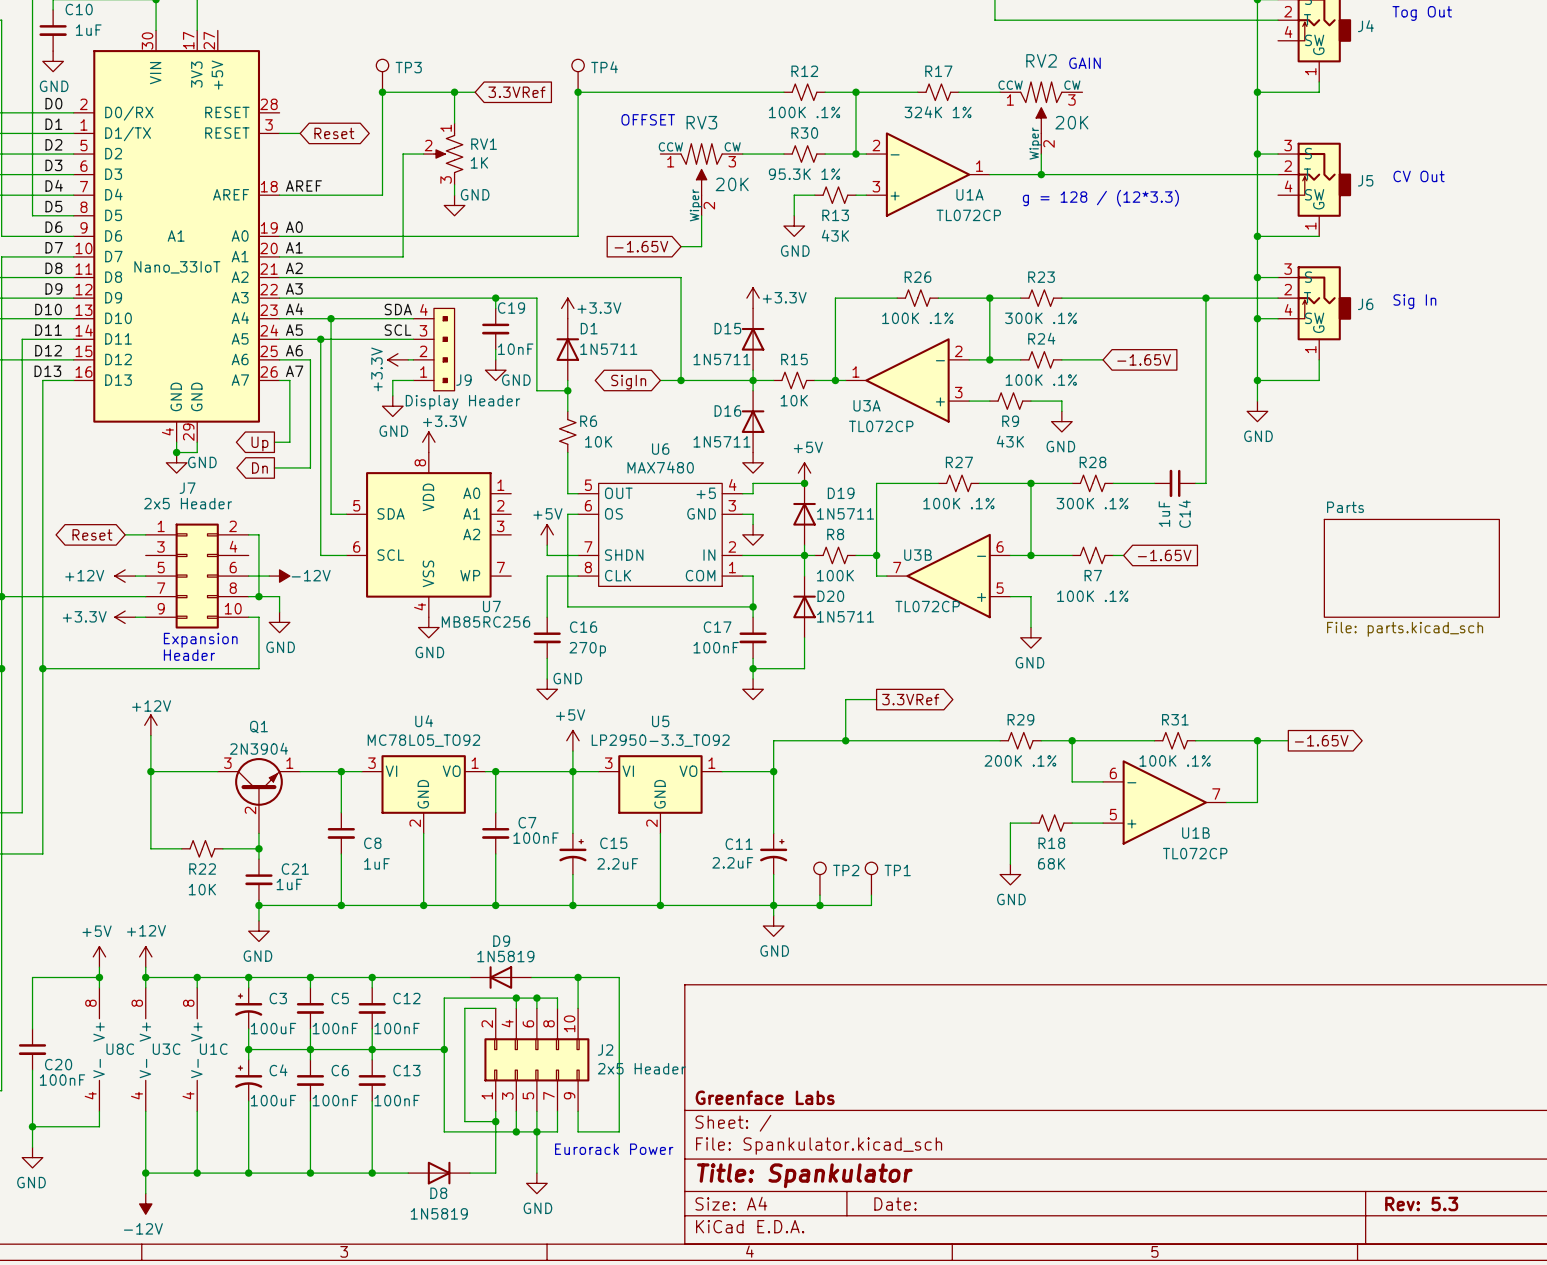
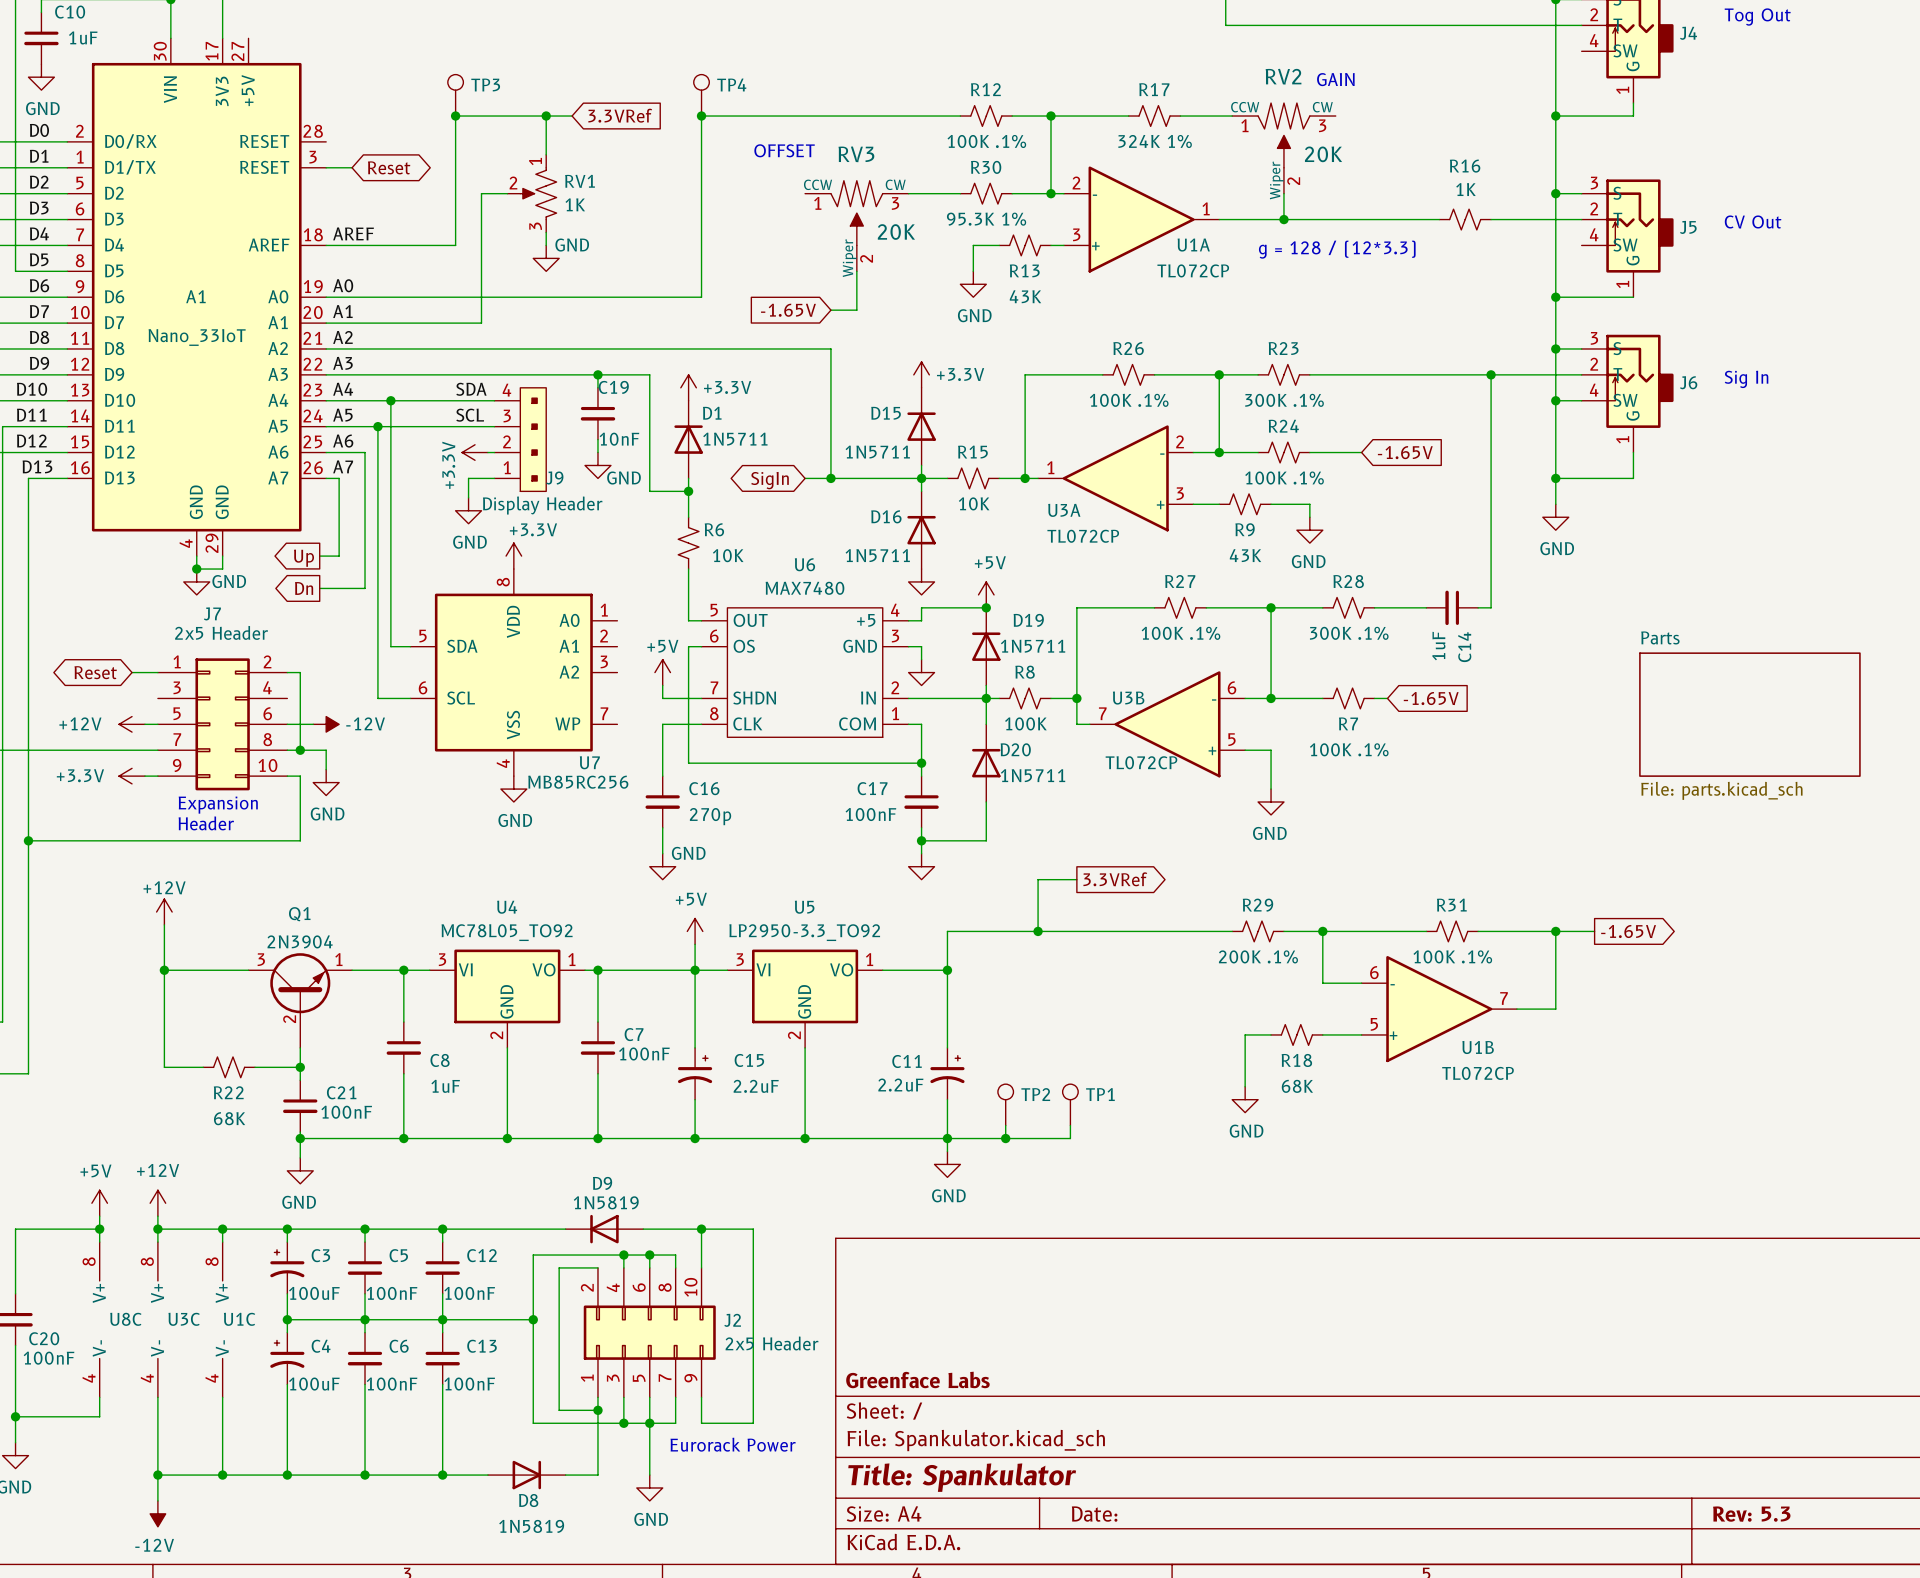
R16: none -> 1K (1465, 219)
C21 value: 1uF (289, 884) -> 100nF (346, 1112)
R22 value: 10K (202, 889) -> 68K (229, 1118)

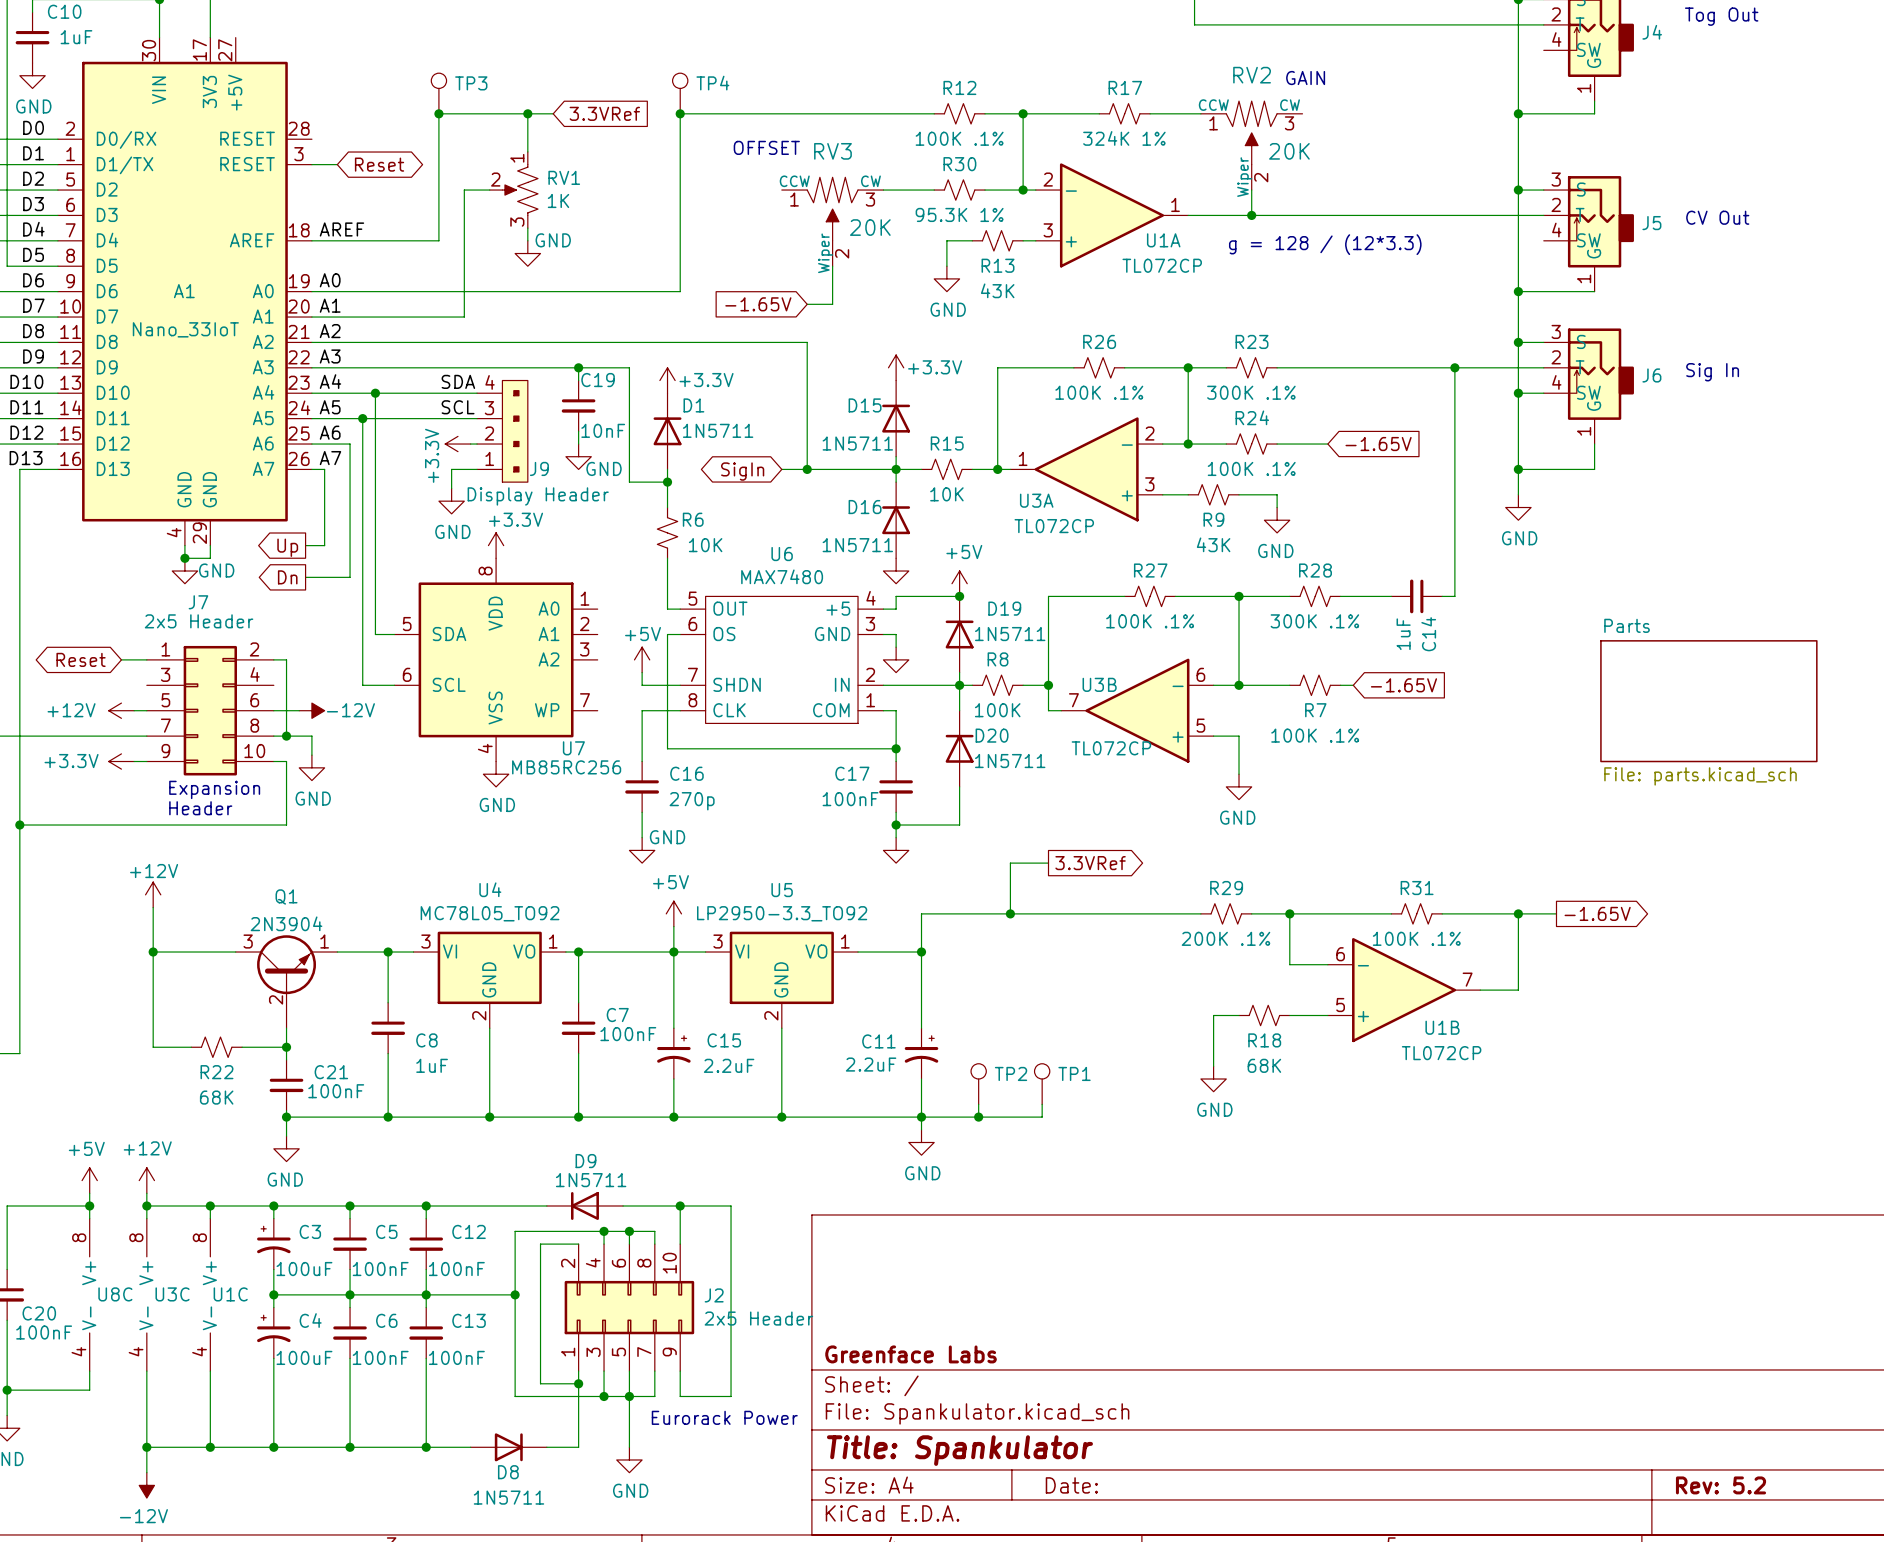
wire: none -> (1404, 215) (1454, 215)
R16: 1K (1465, 219) -> none
D9 value: 1N5819 (606, 1202) -> 1N5711 (591, 1180)
title block: Rev: 5.3 (1751, 1514) -> Rev: 5.2 (1721, 1485)
D8 value: 1N5819 (531, 1526) -> 1N5711 (508, 1497)

